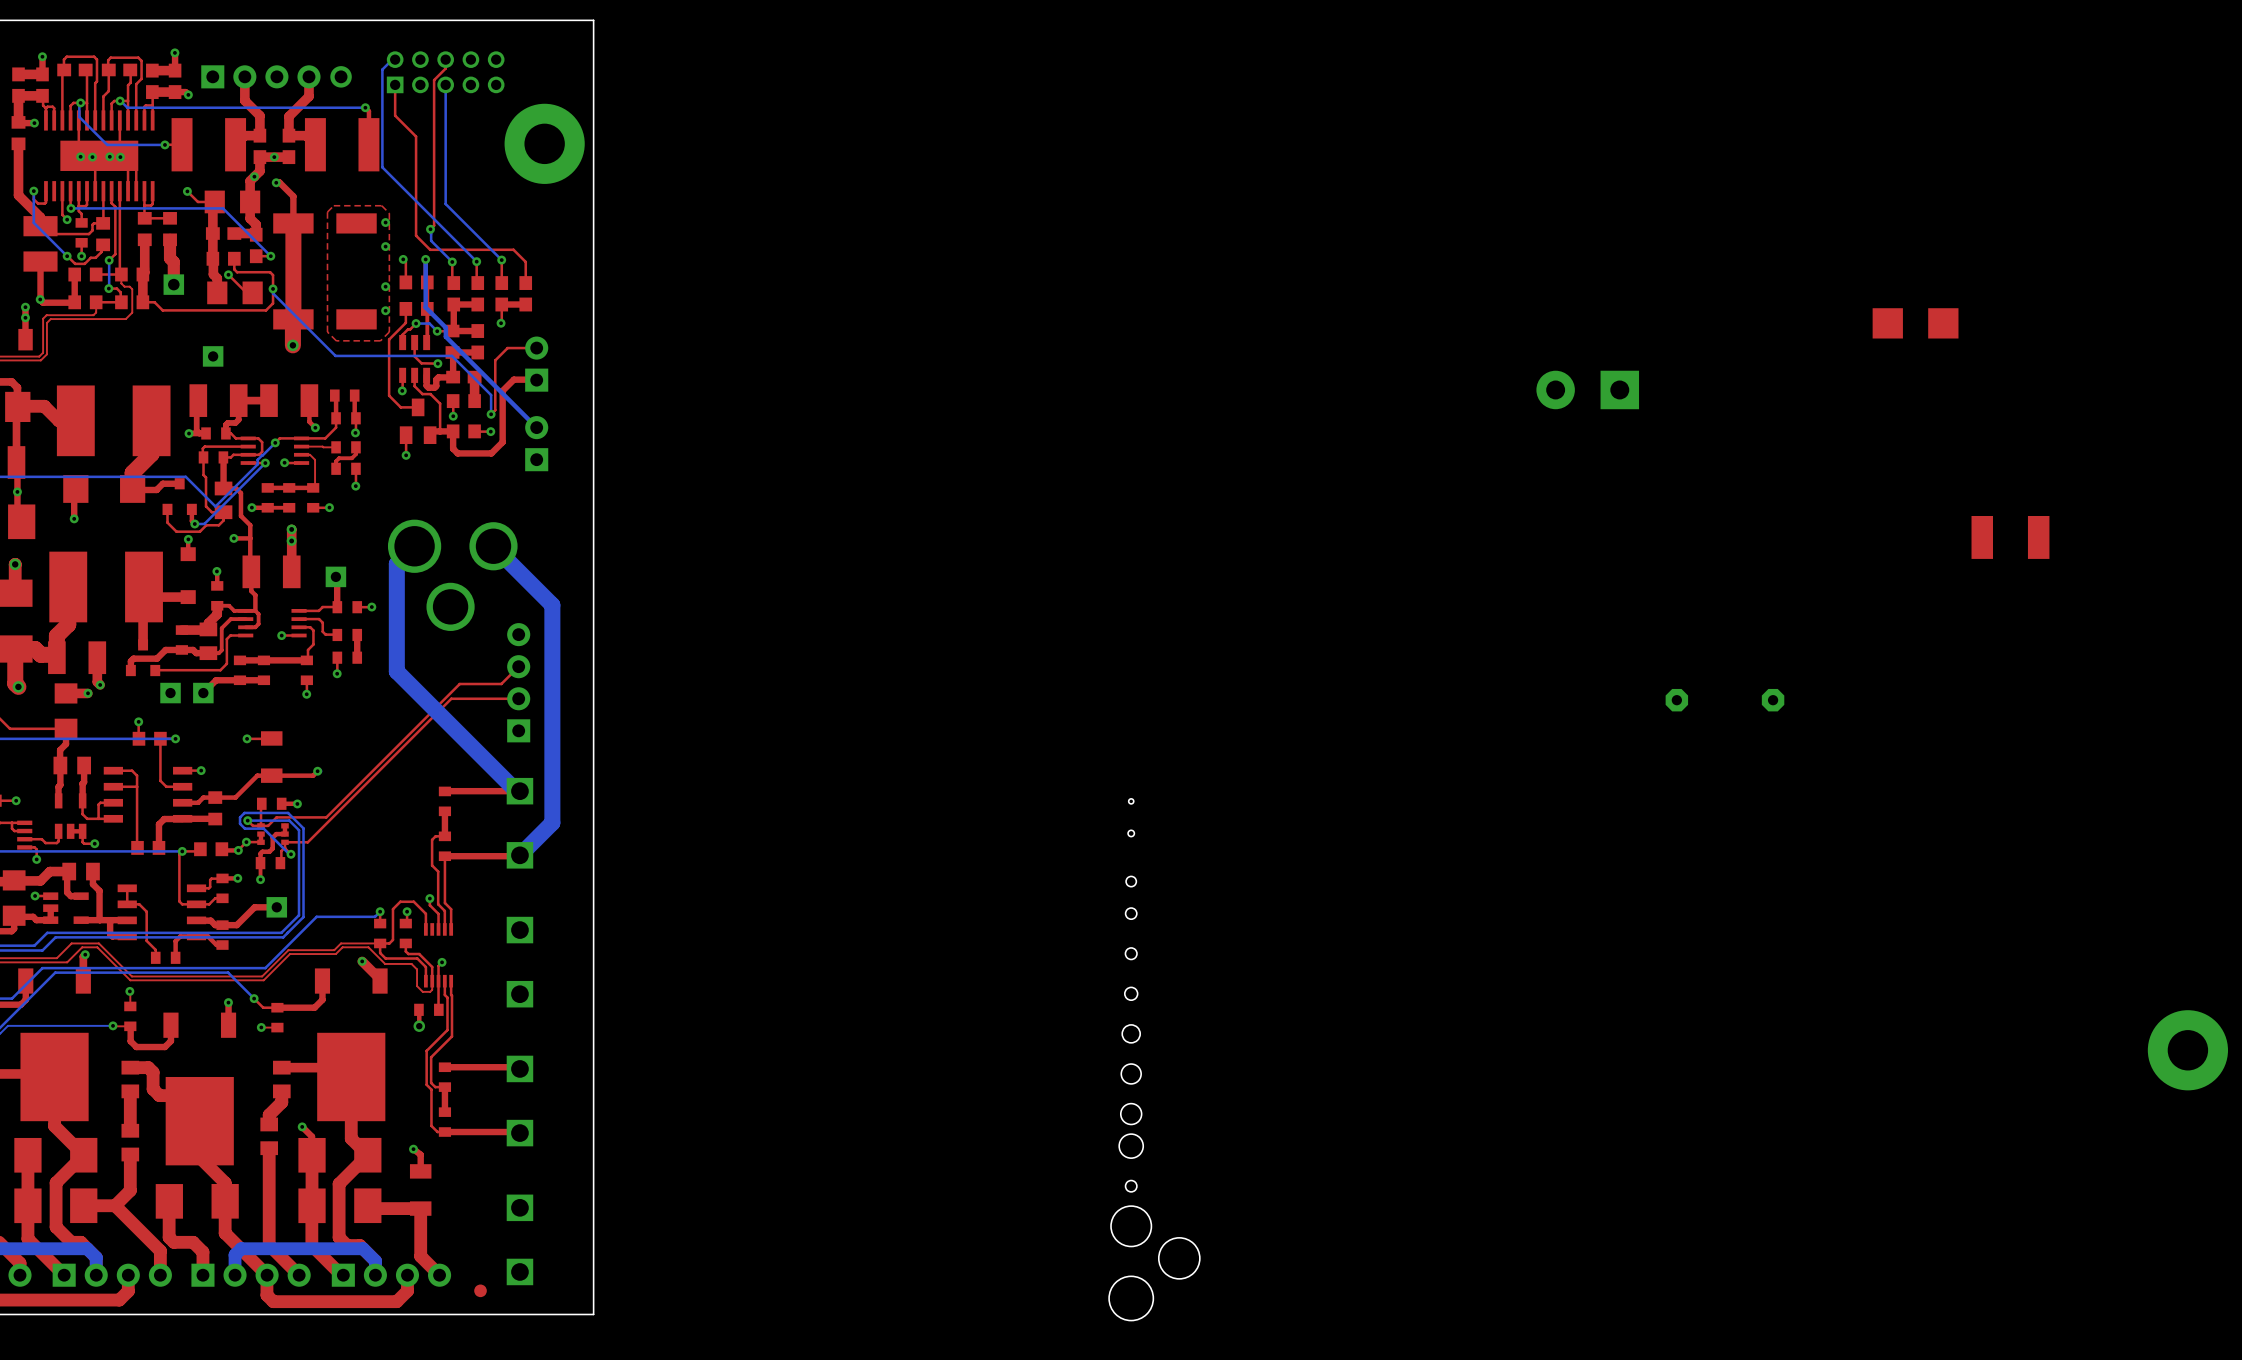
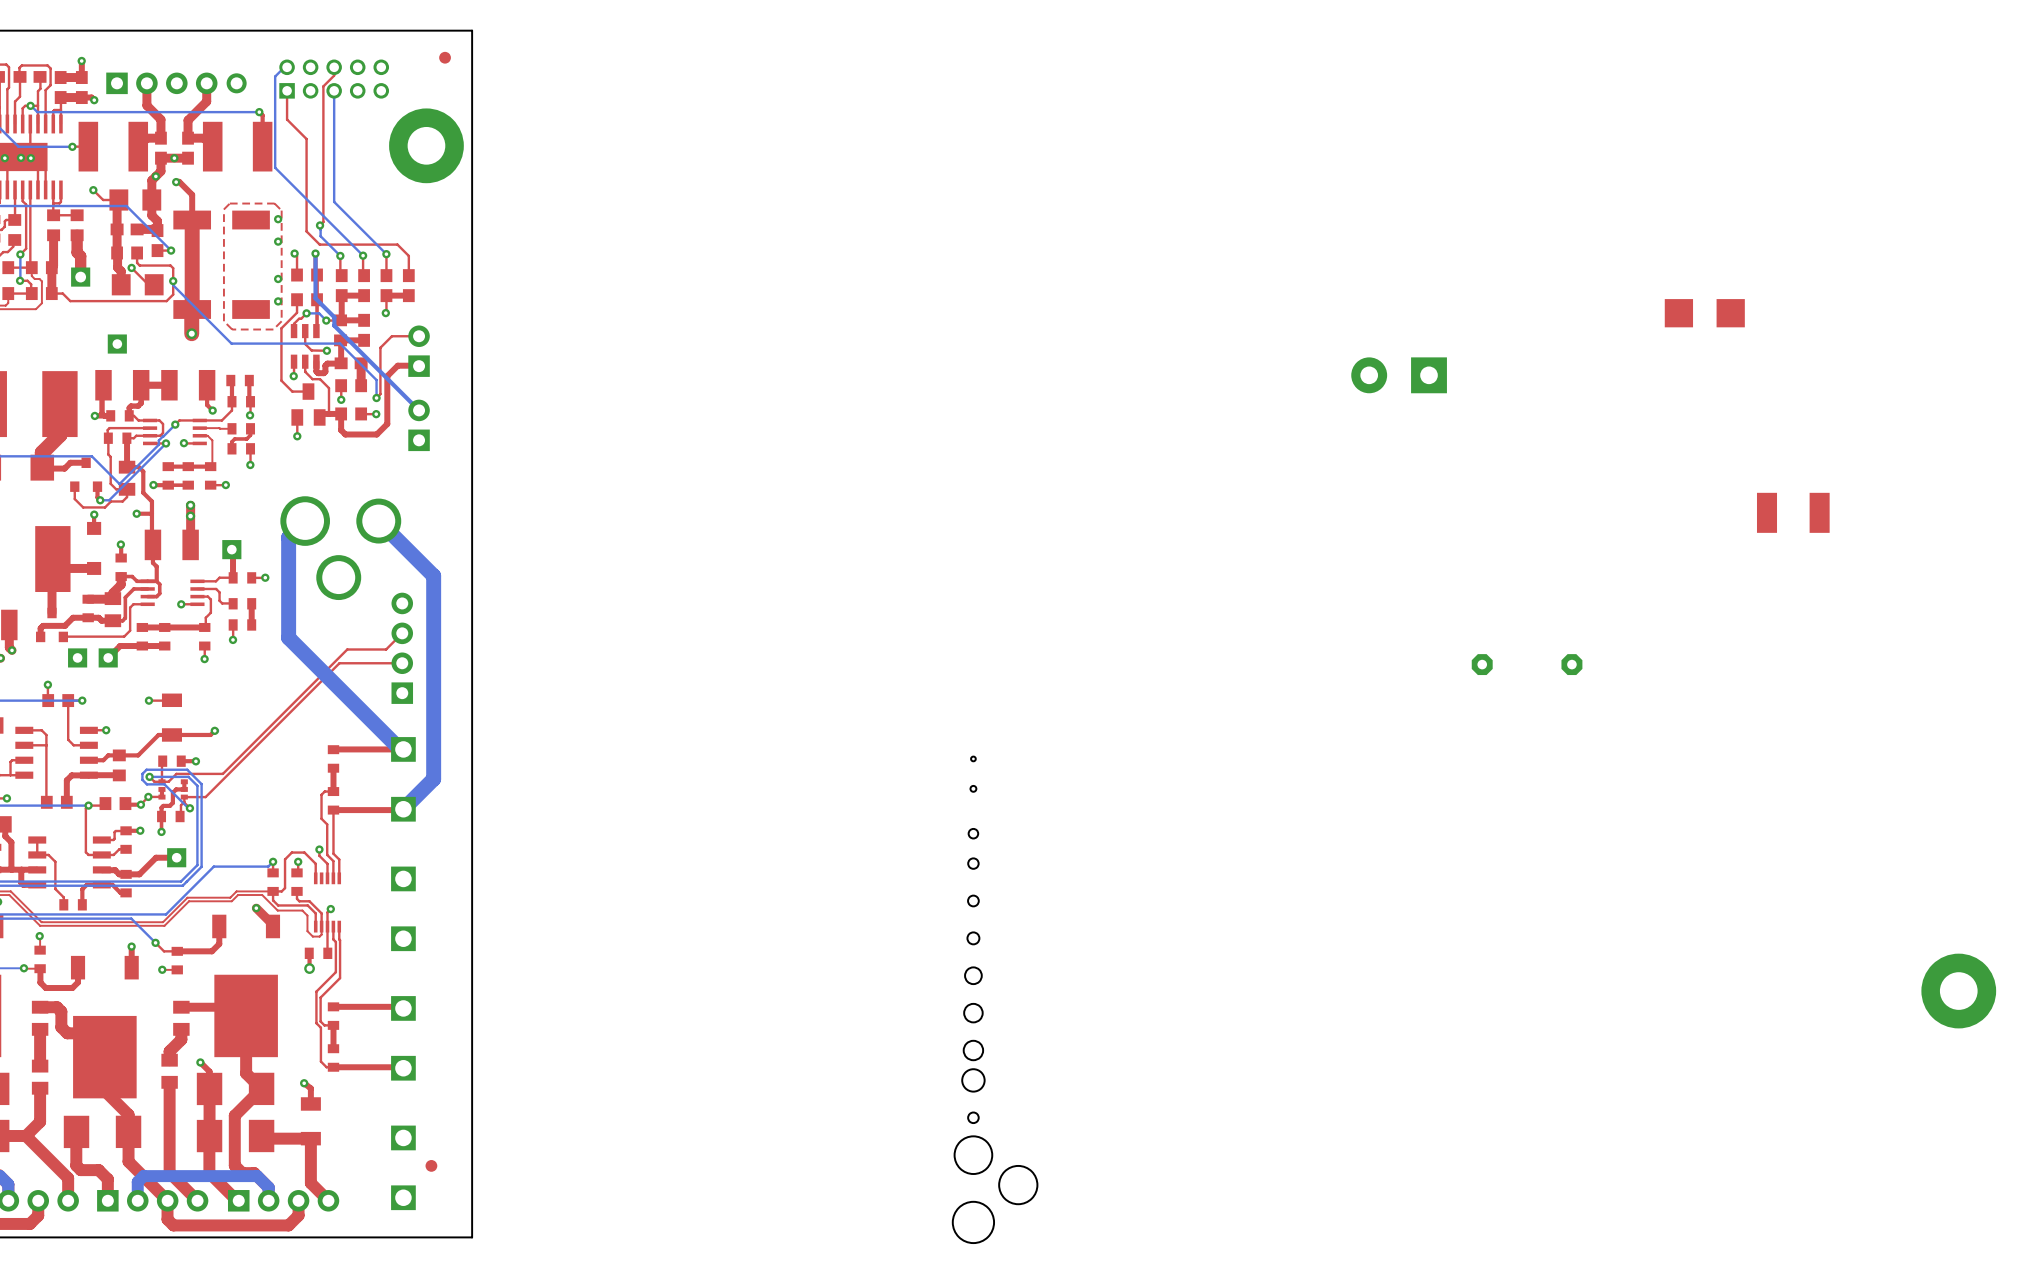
drawing: none -> [439, 51, 451, 64]
drawing position: (480, 1290) -> (431, 1165)

